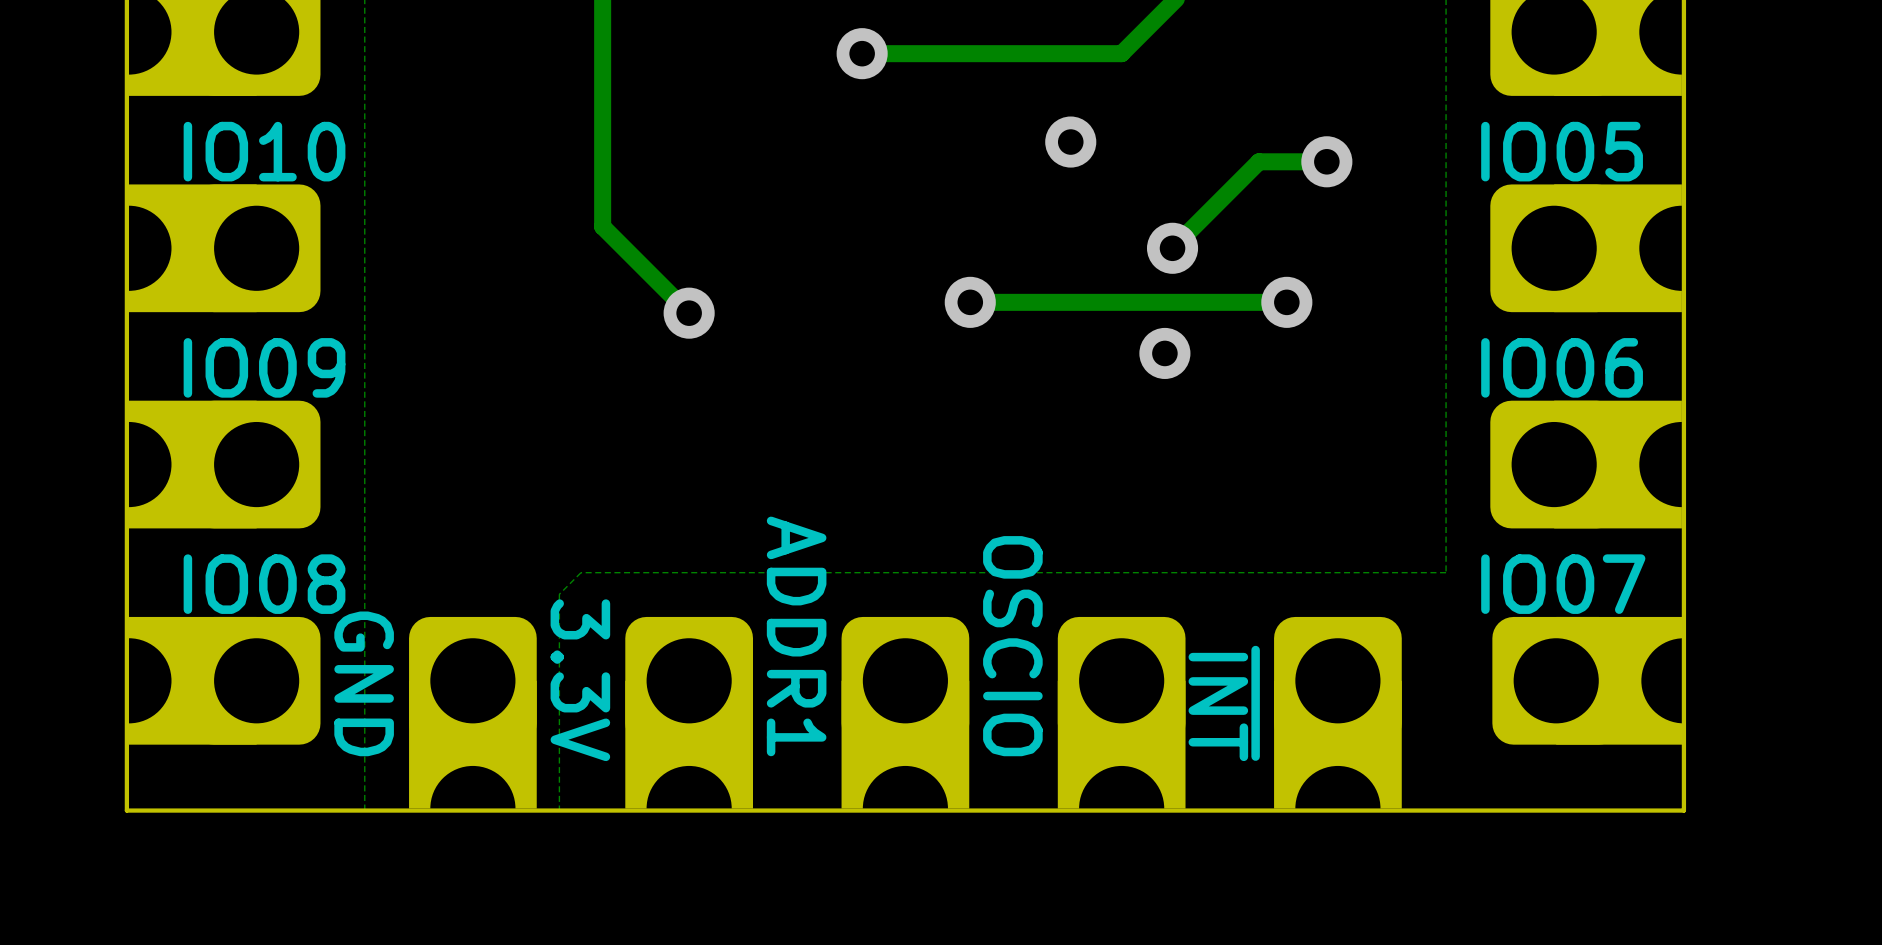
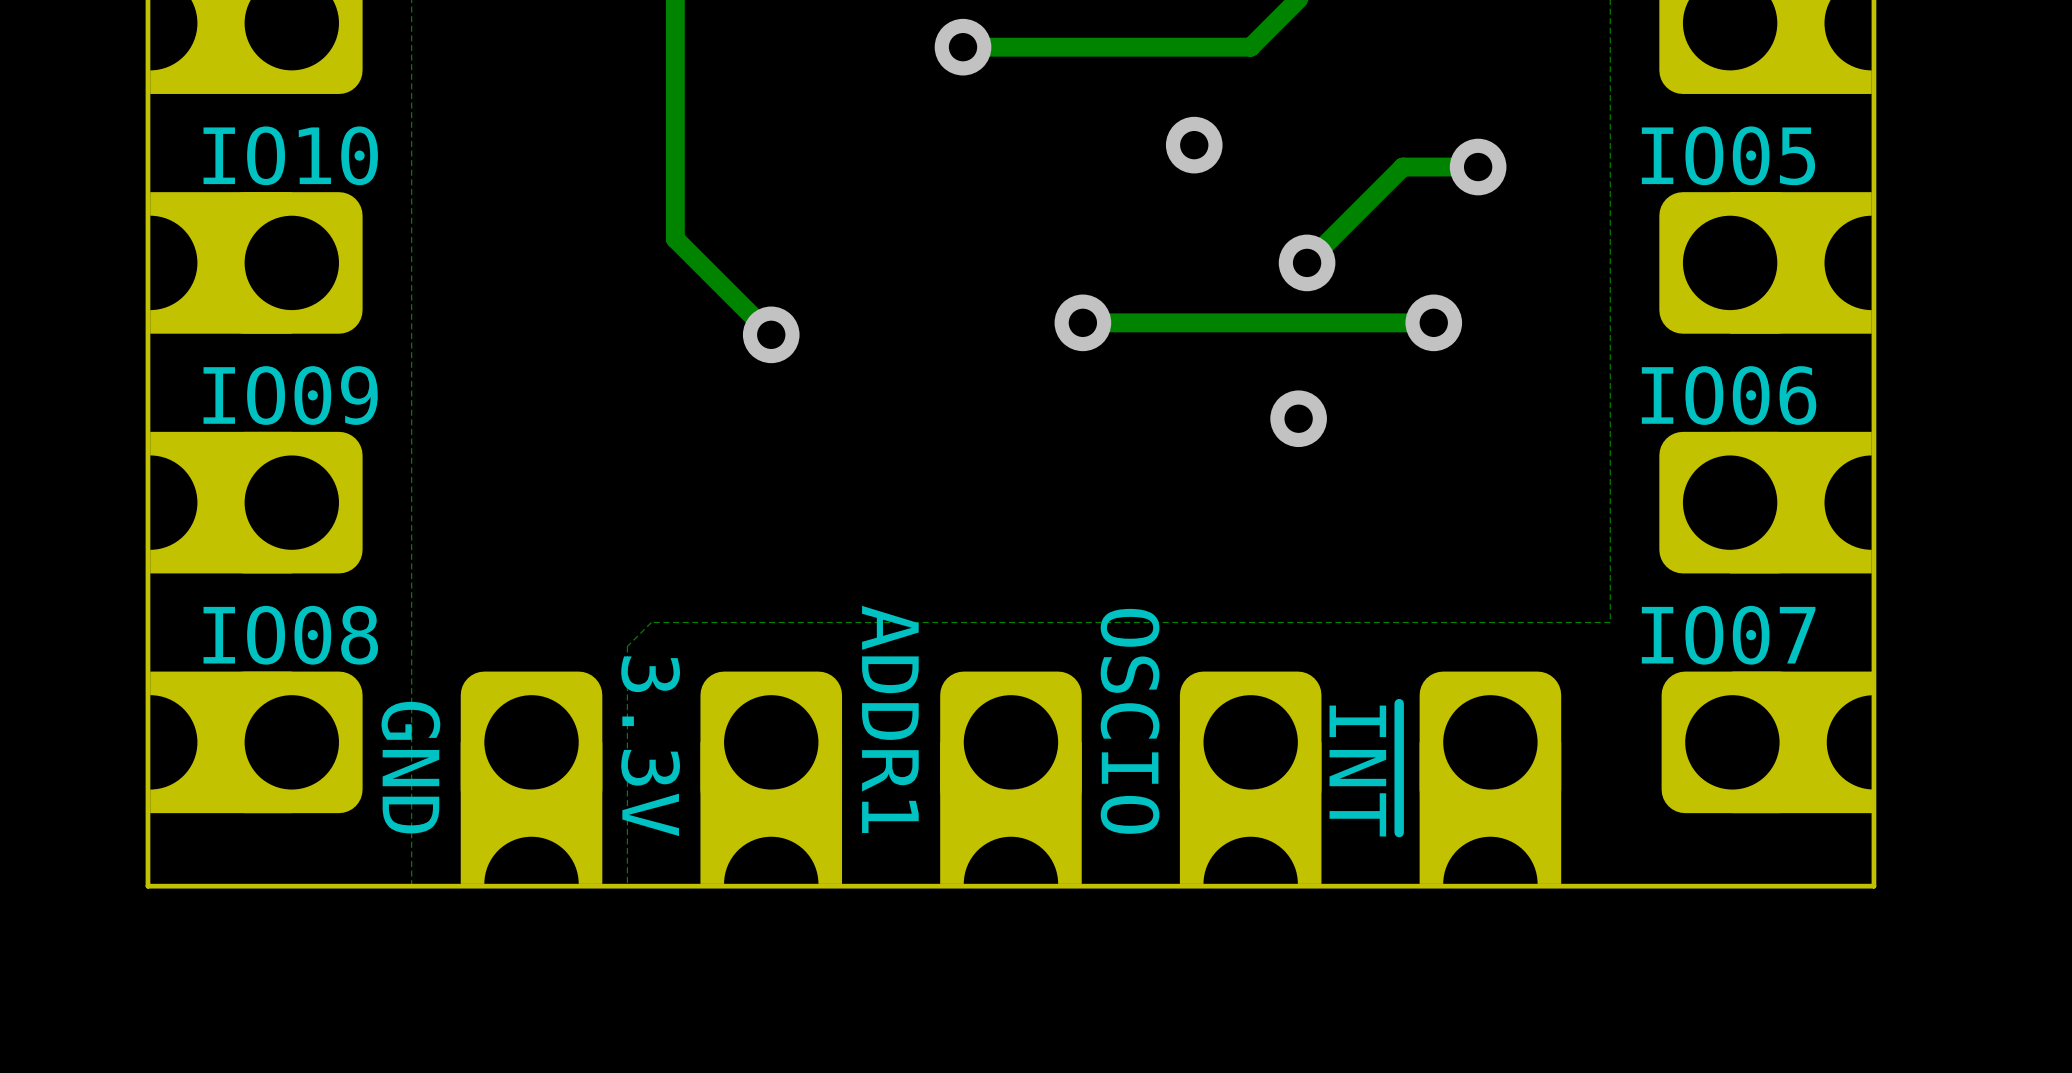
via position: (1164, 353) -> (1298, 418)

